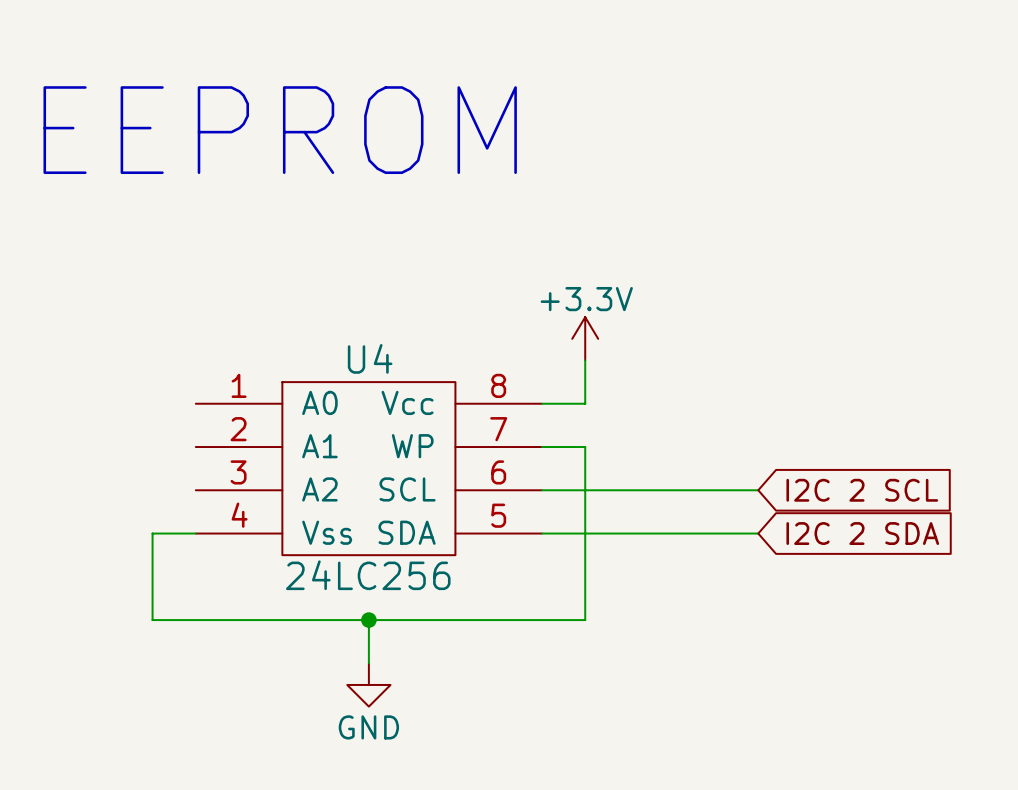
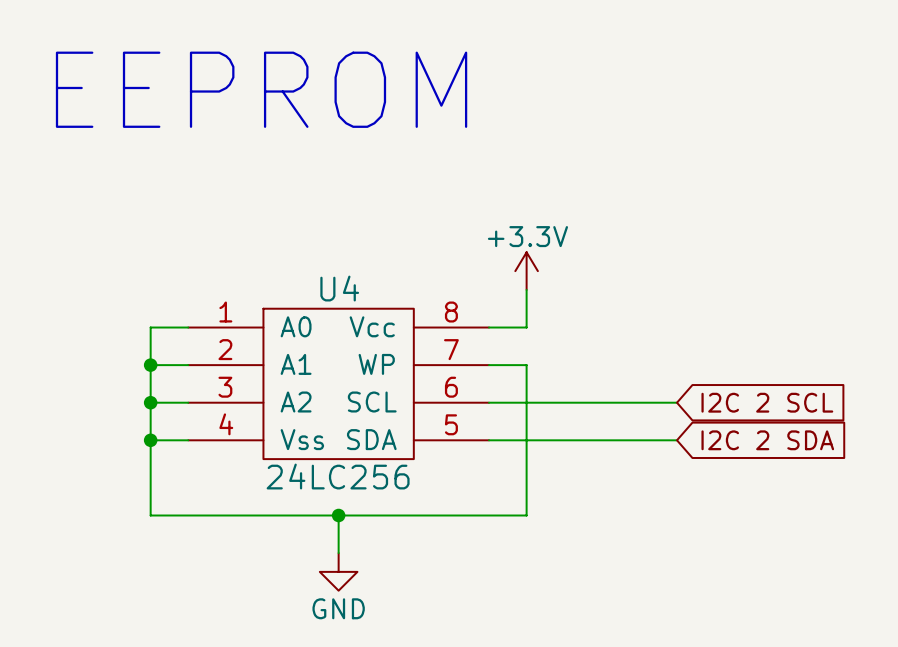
wire: none -> (188, 327) (150, 327) (150, 440)
wire: none -> (150, 365) (188, 365)
junction: none -> (150, 365)
wire: none -> (150, 402) (188, 402)
junction: none -> (150, 402)
junction: none -> (150, 440)

